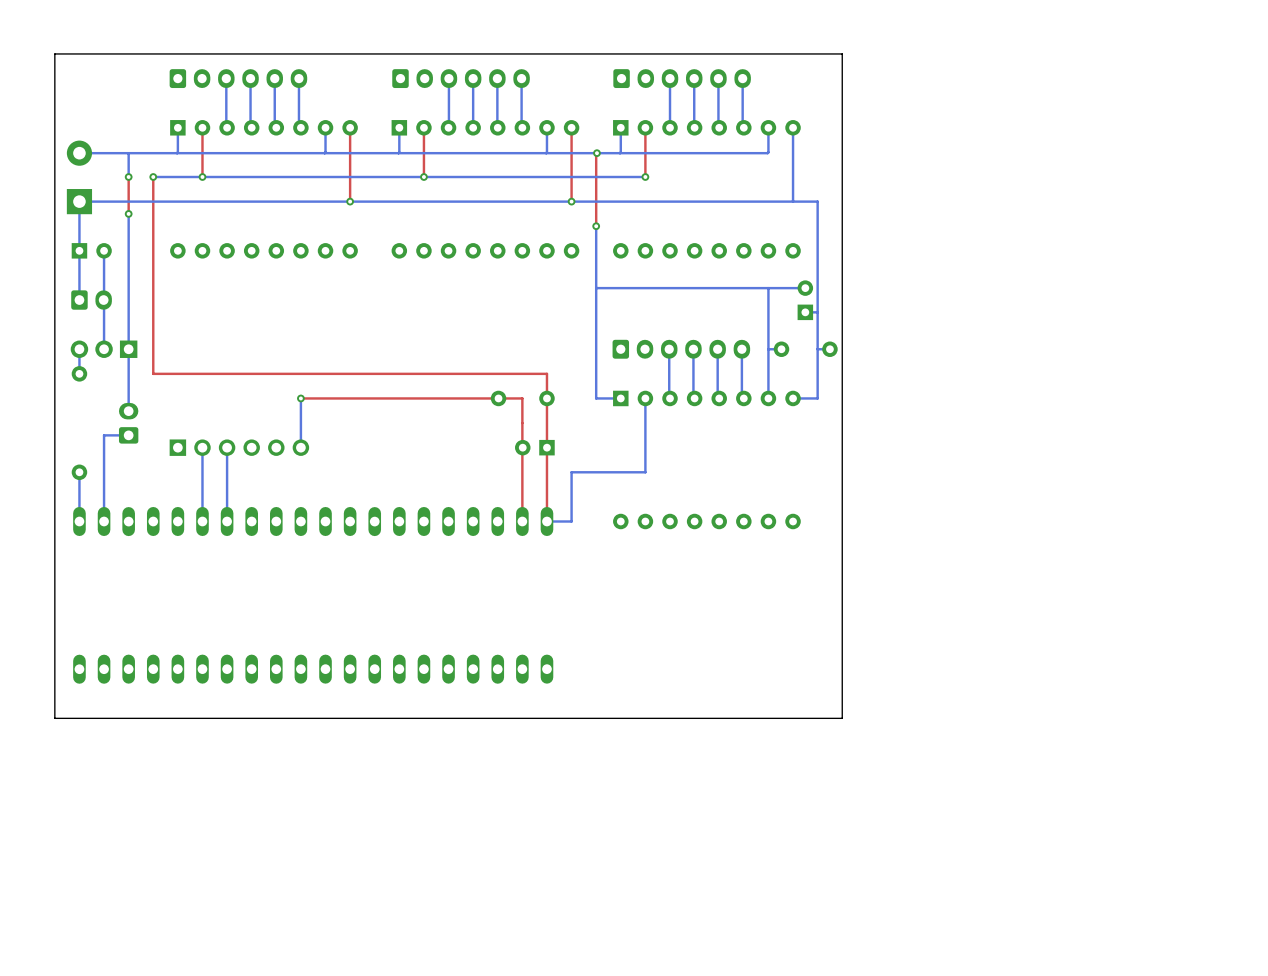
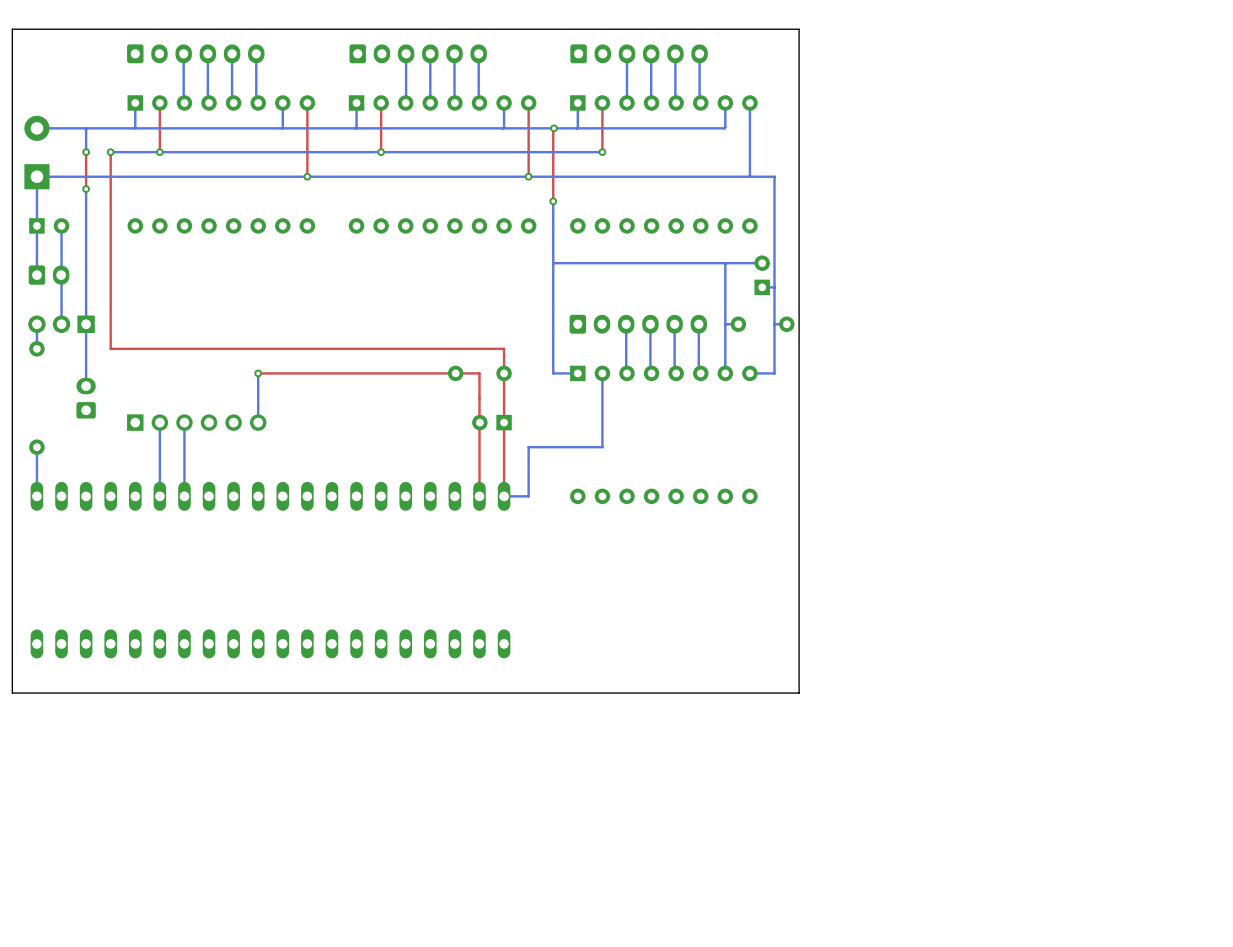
bottom track: (128, 435) (104, 435) (104, 521) -> none

